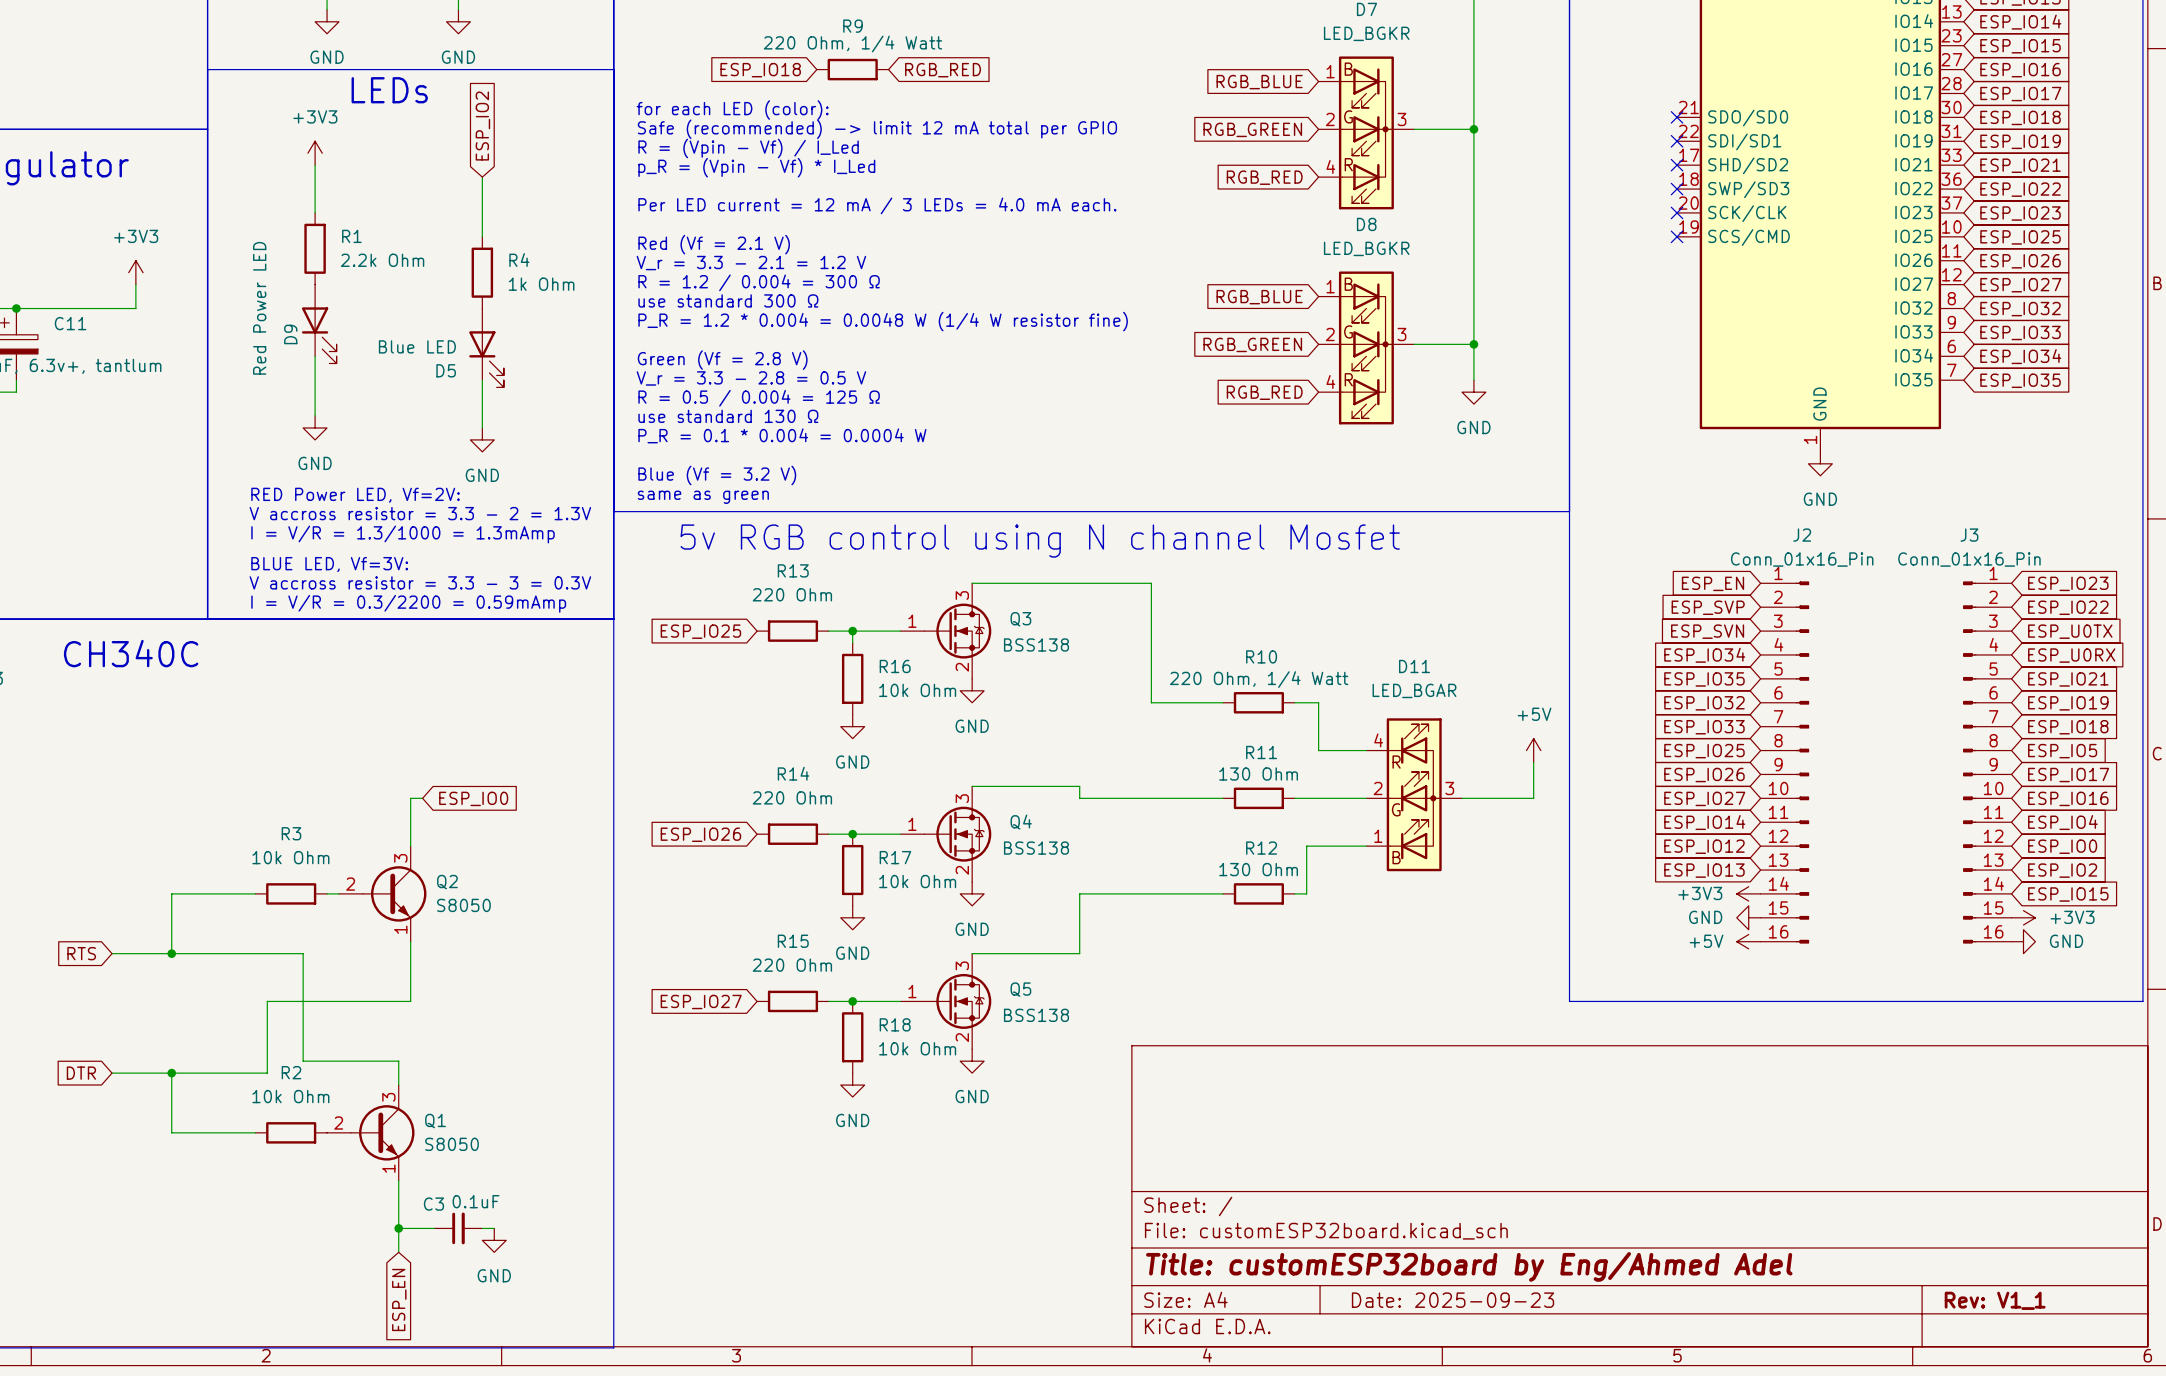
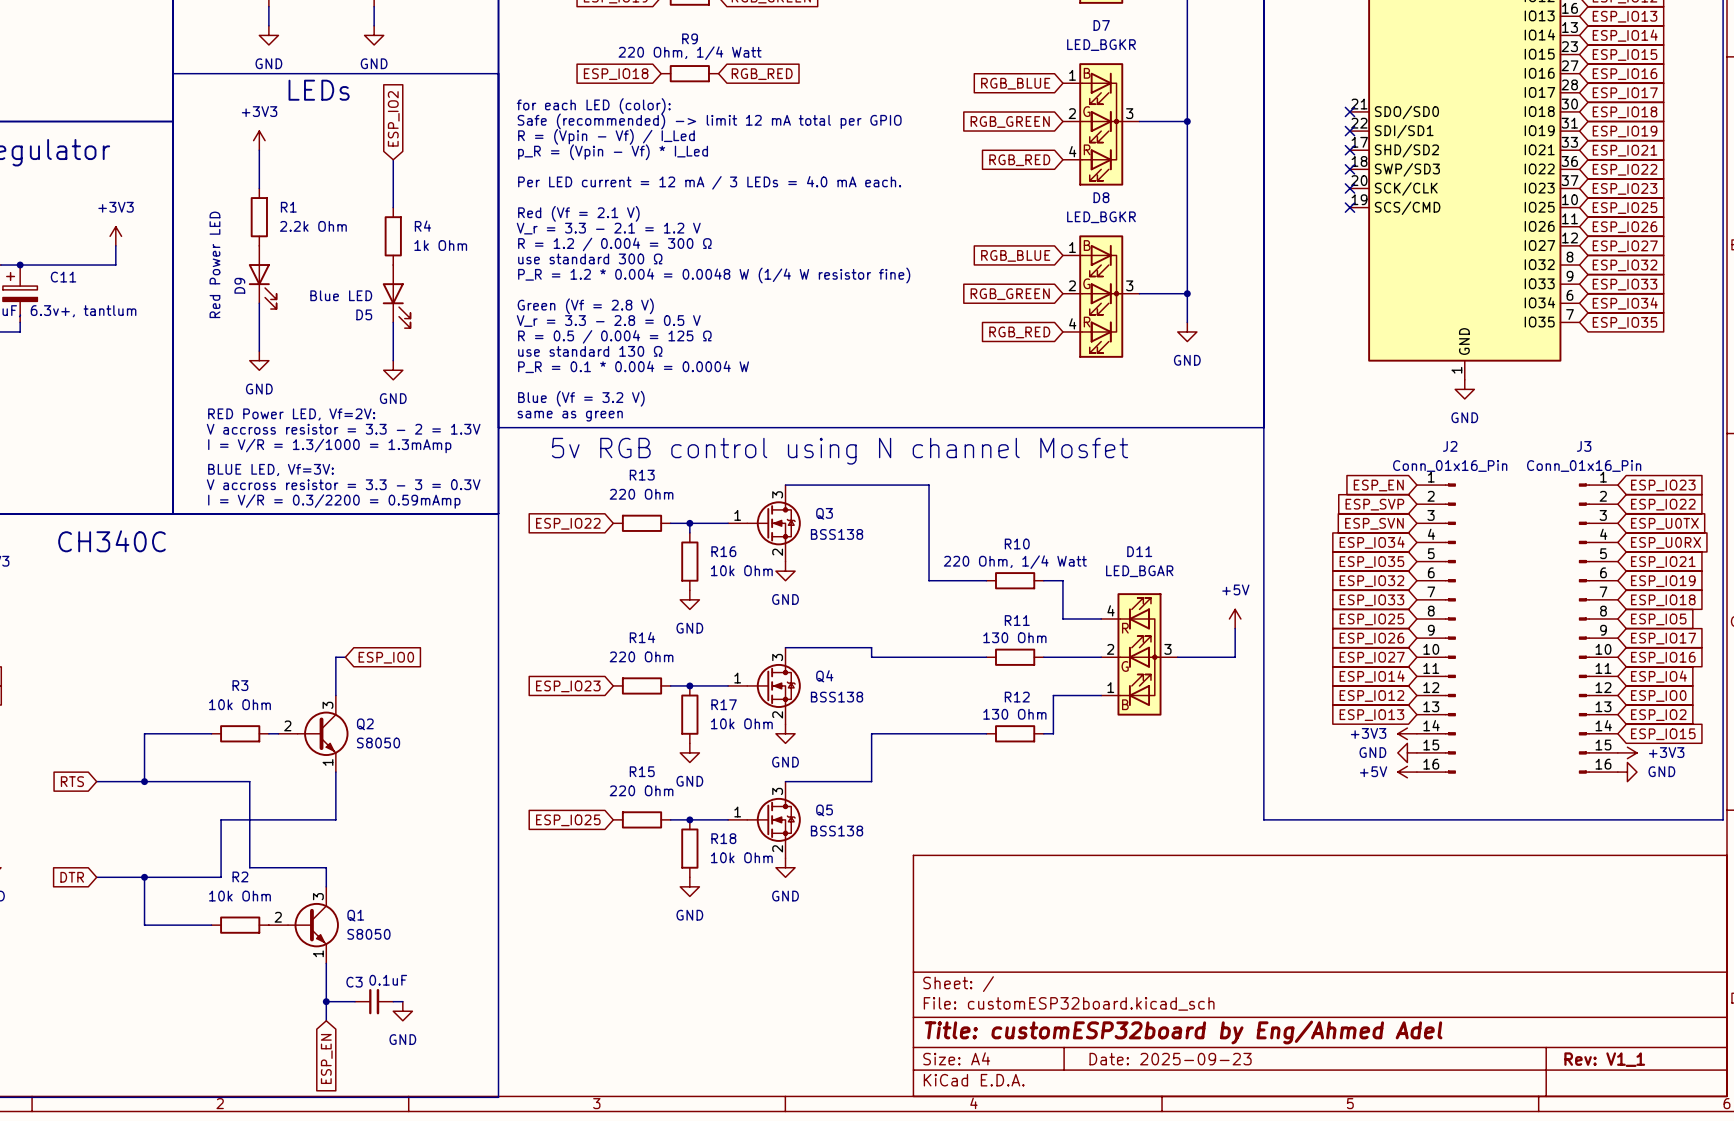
global label: ESP_IO25 (700, 631) -> ESP_IO22 (568, 523)
global label: ESP_IO26 (700, 834) -> ESP_IO23 (568, 686)
global label: ESP_IO27 (701, 1002) -> ESP_IO25 (568, 820)

